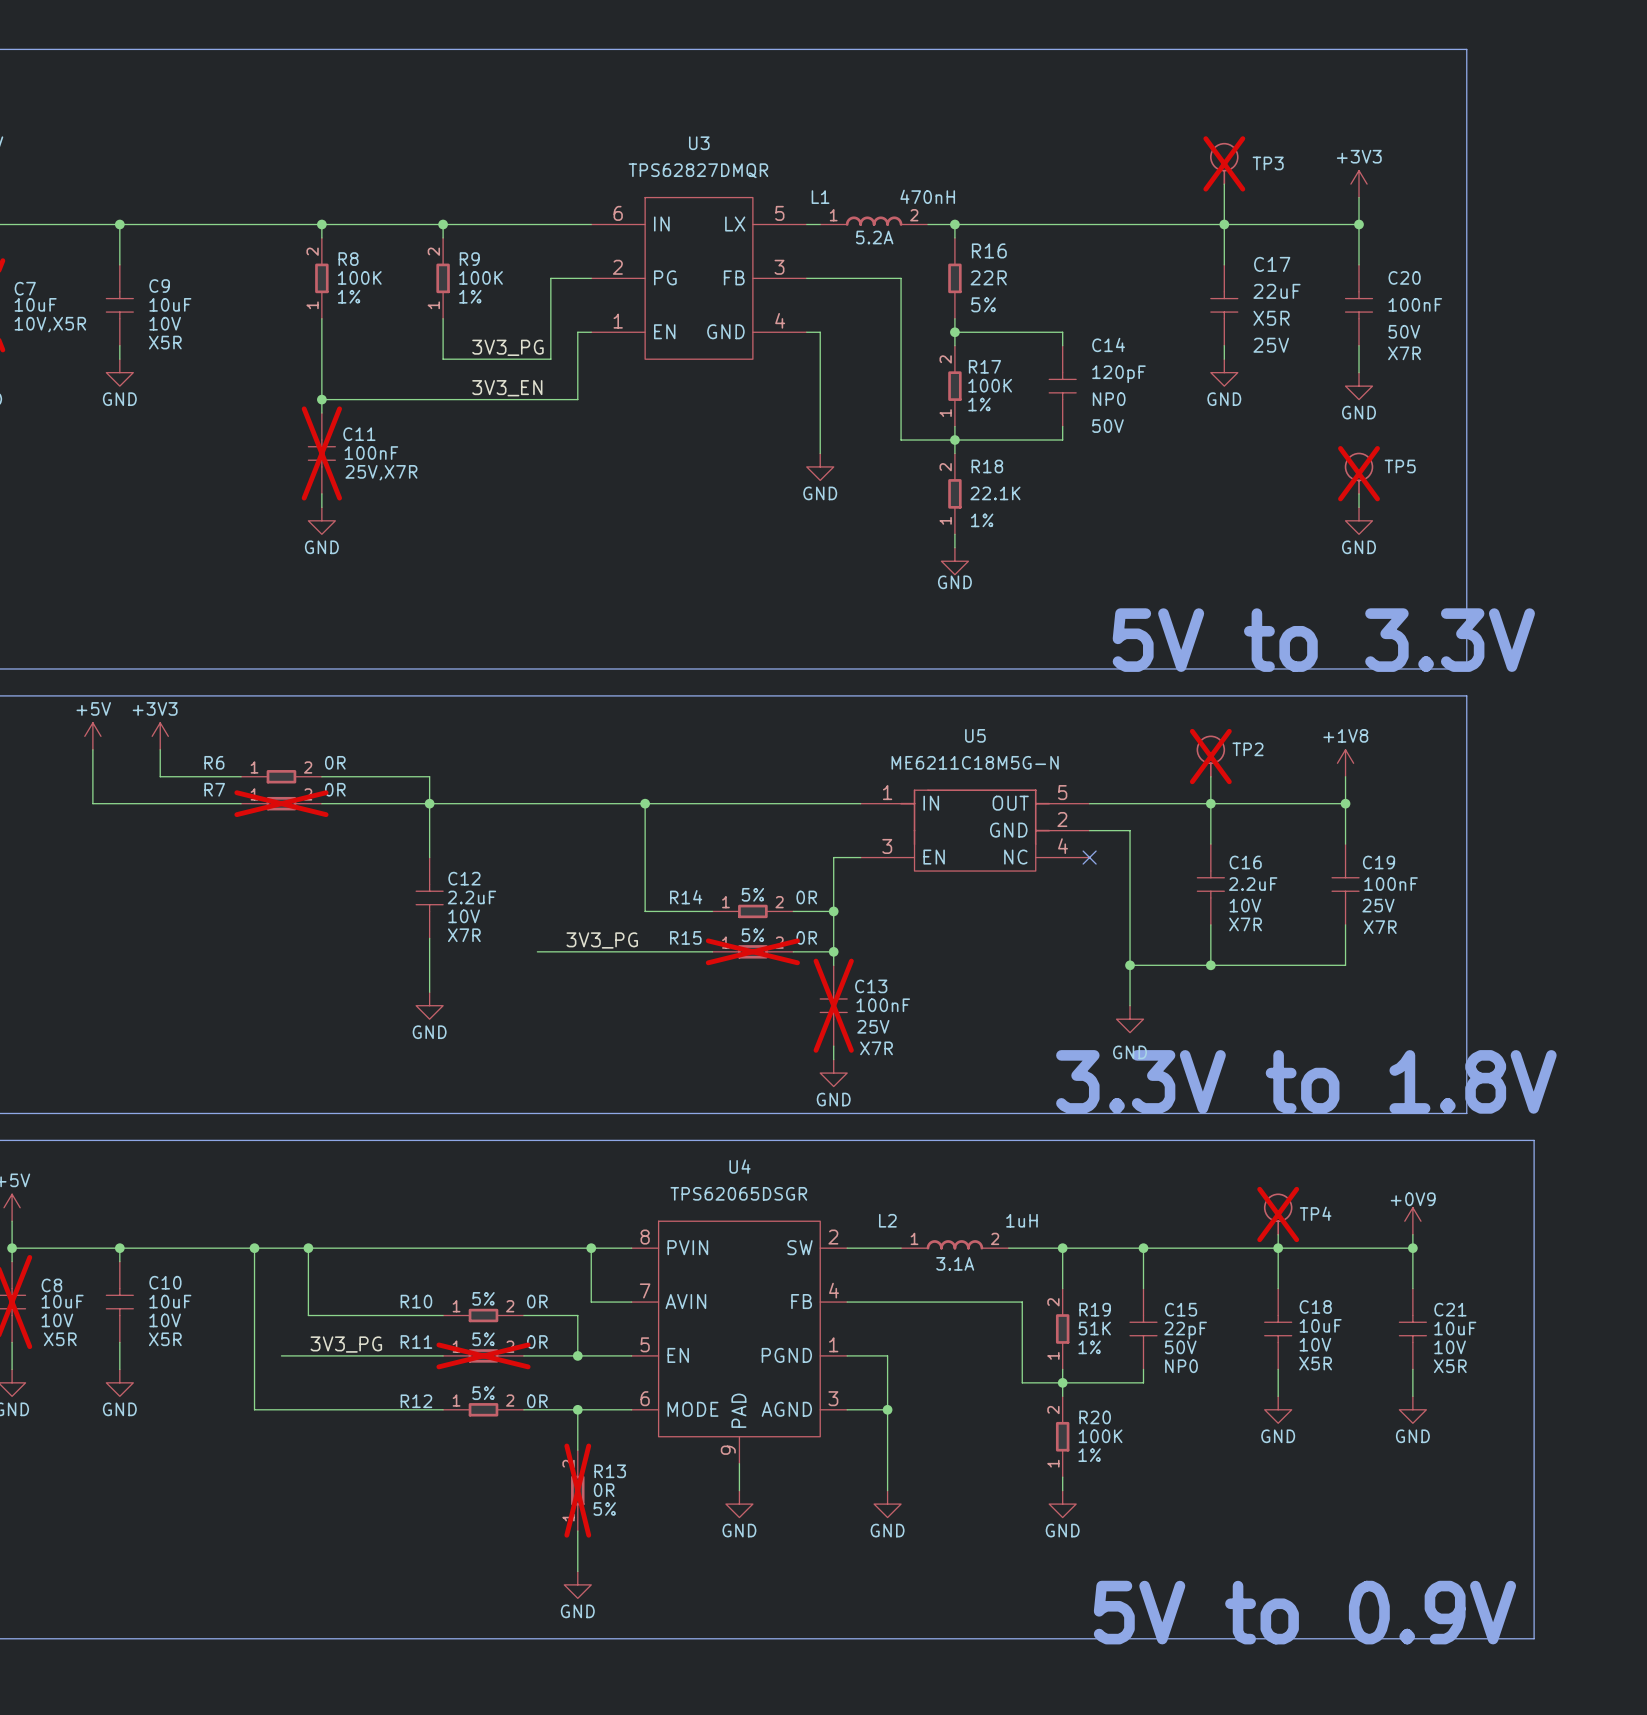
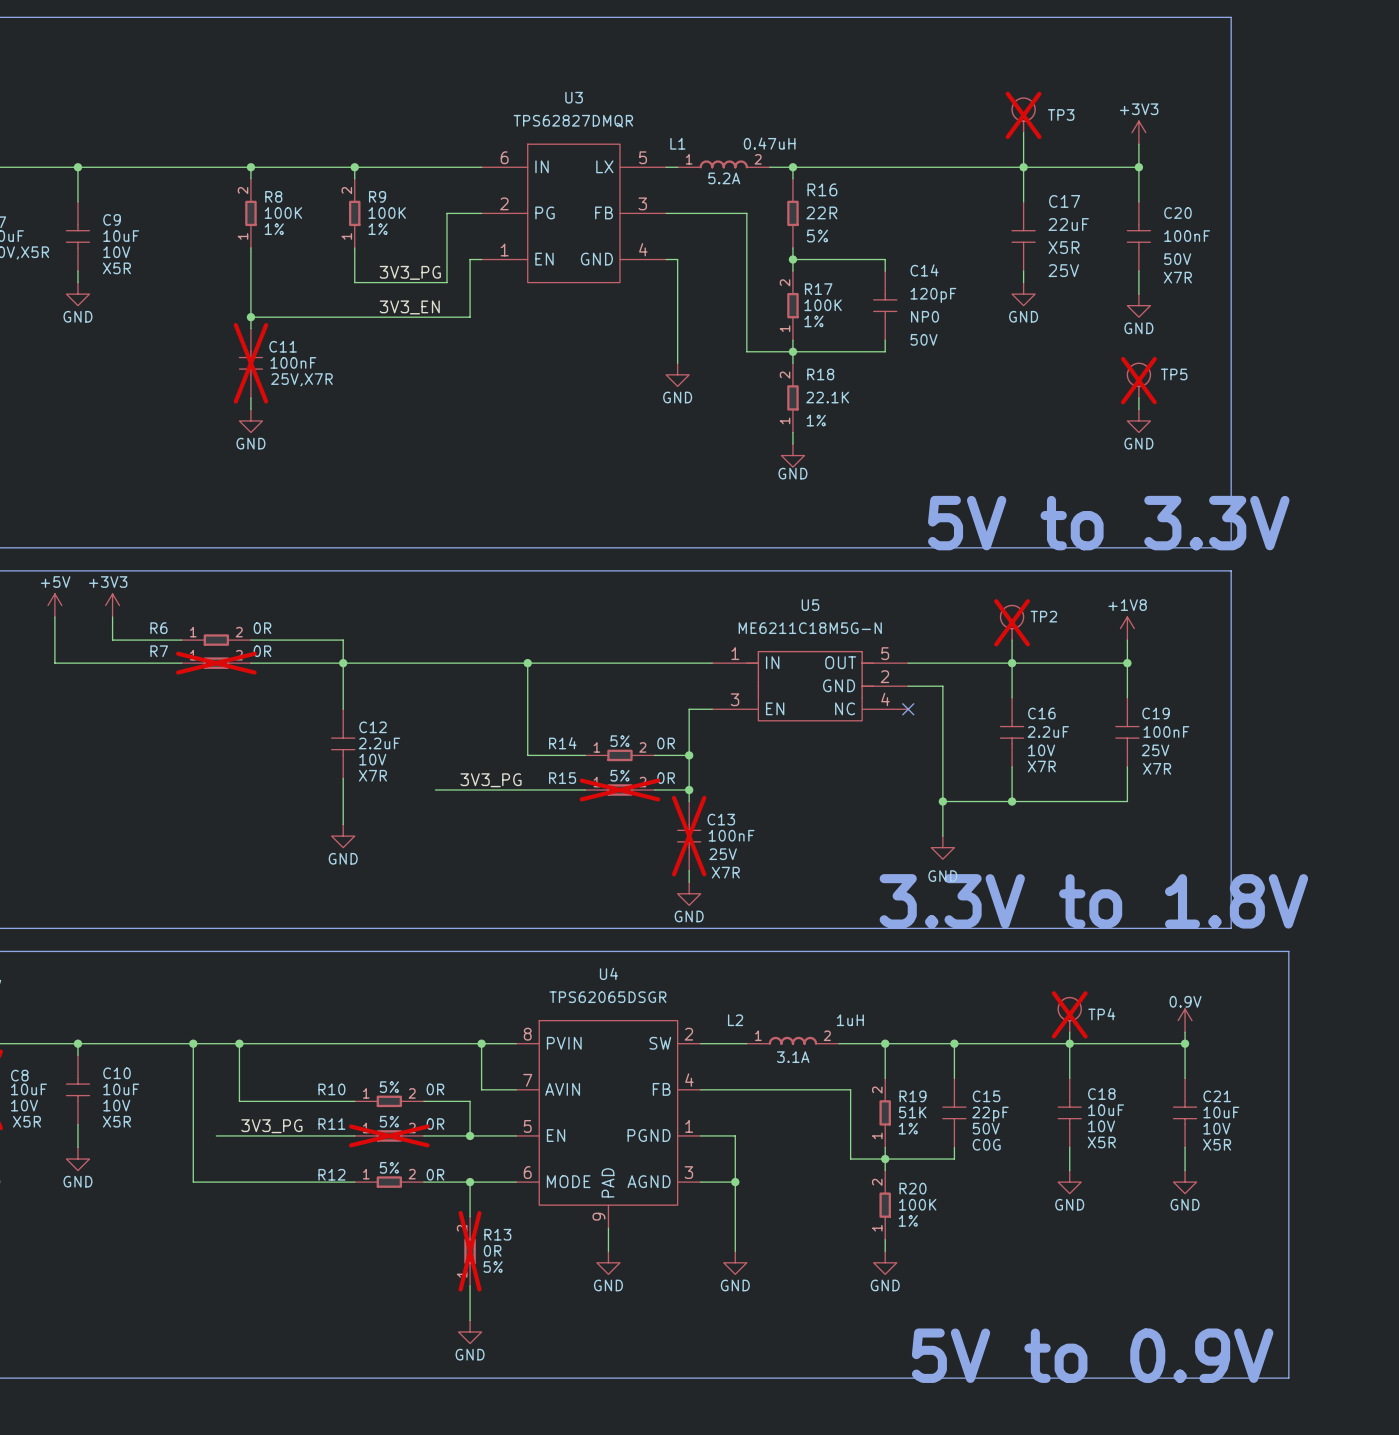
L1 value: 470nH (927, 196) -> 0.47uH (769, 143)
power symbol: +0V9 (1412, 1221) -> 0.9V (1185, 1020)
C15 text: NP0 (1181, 1366) -> C0G (986, 1144)

